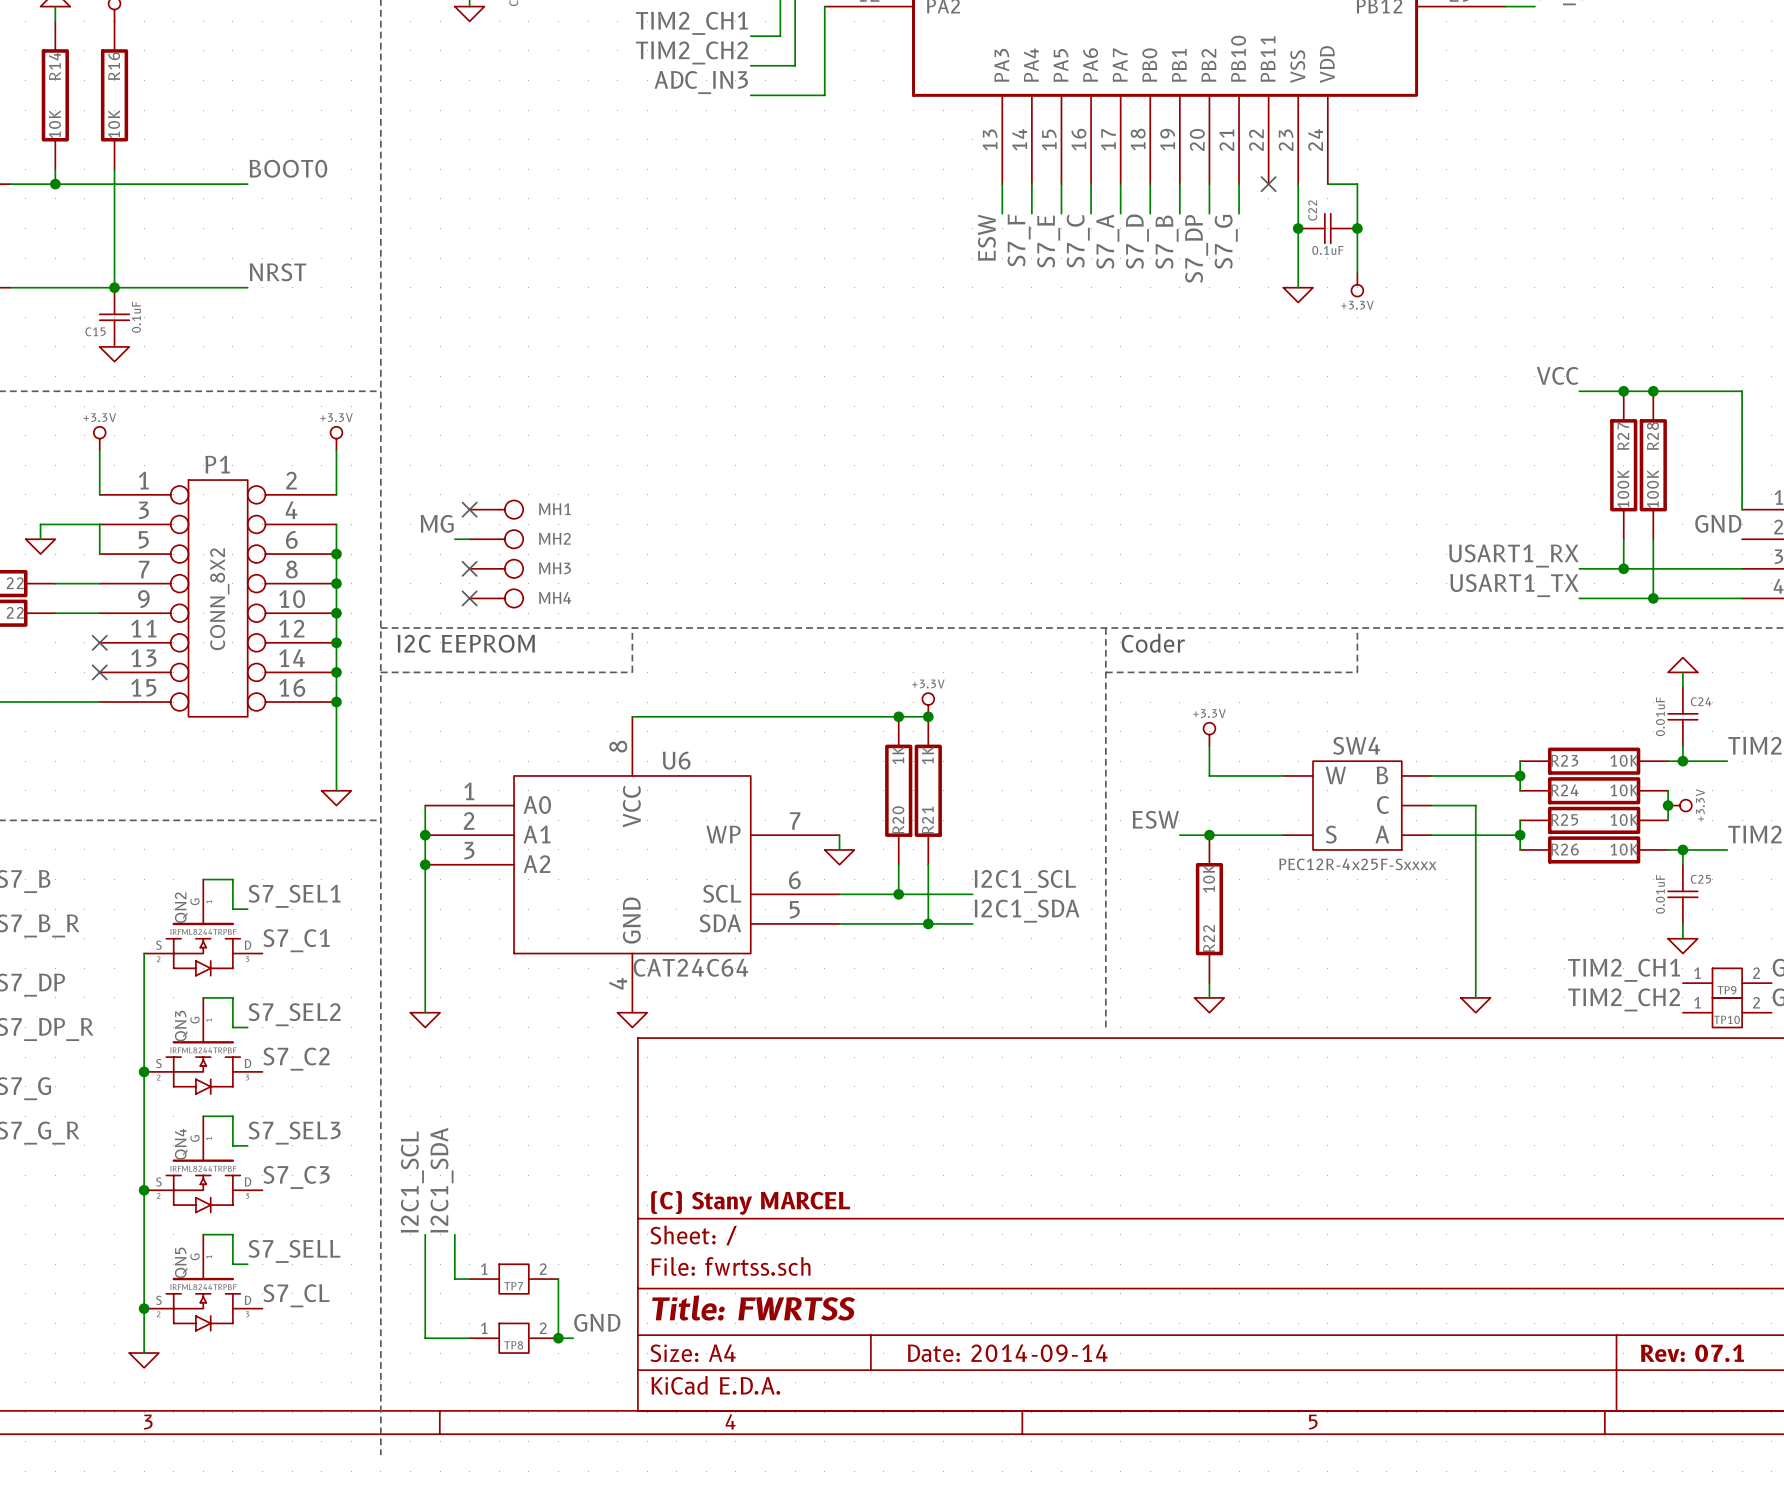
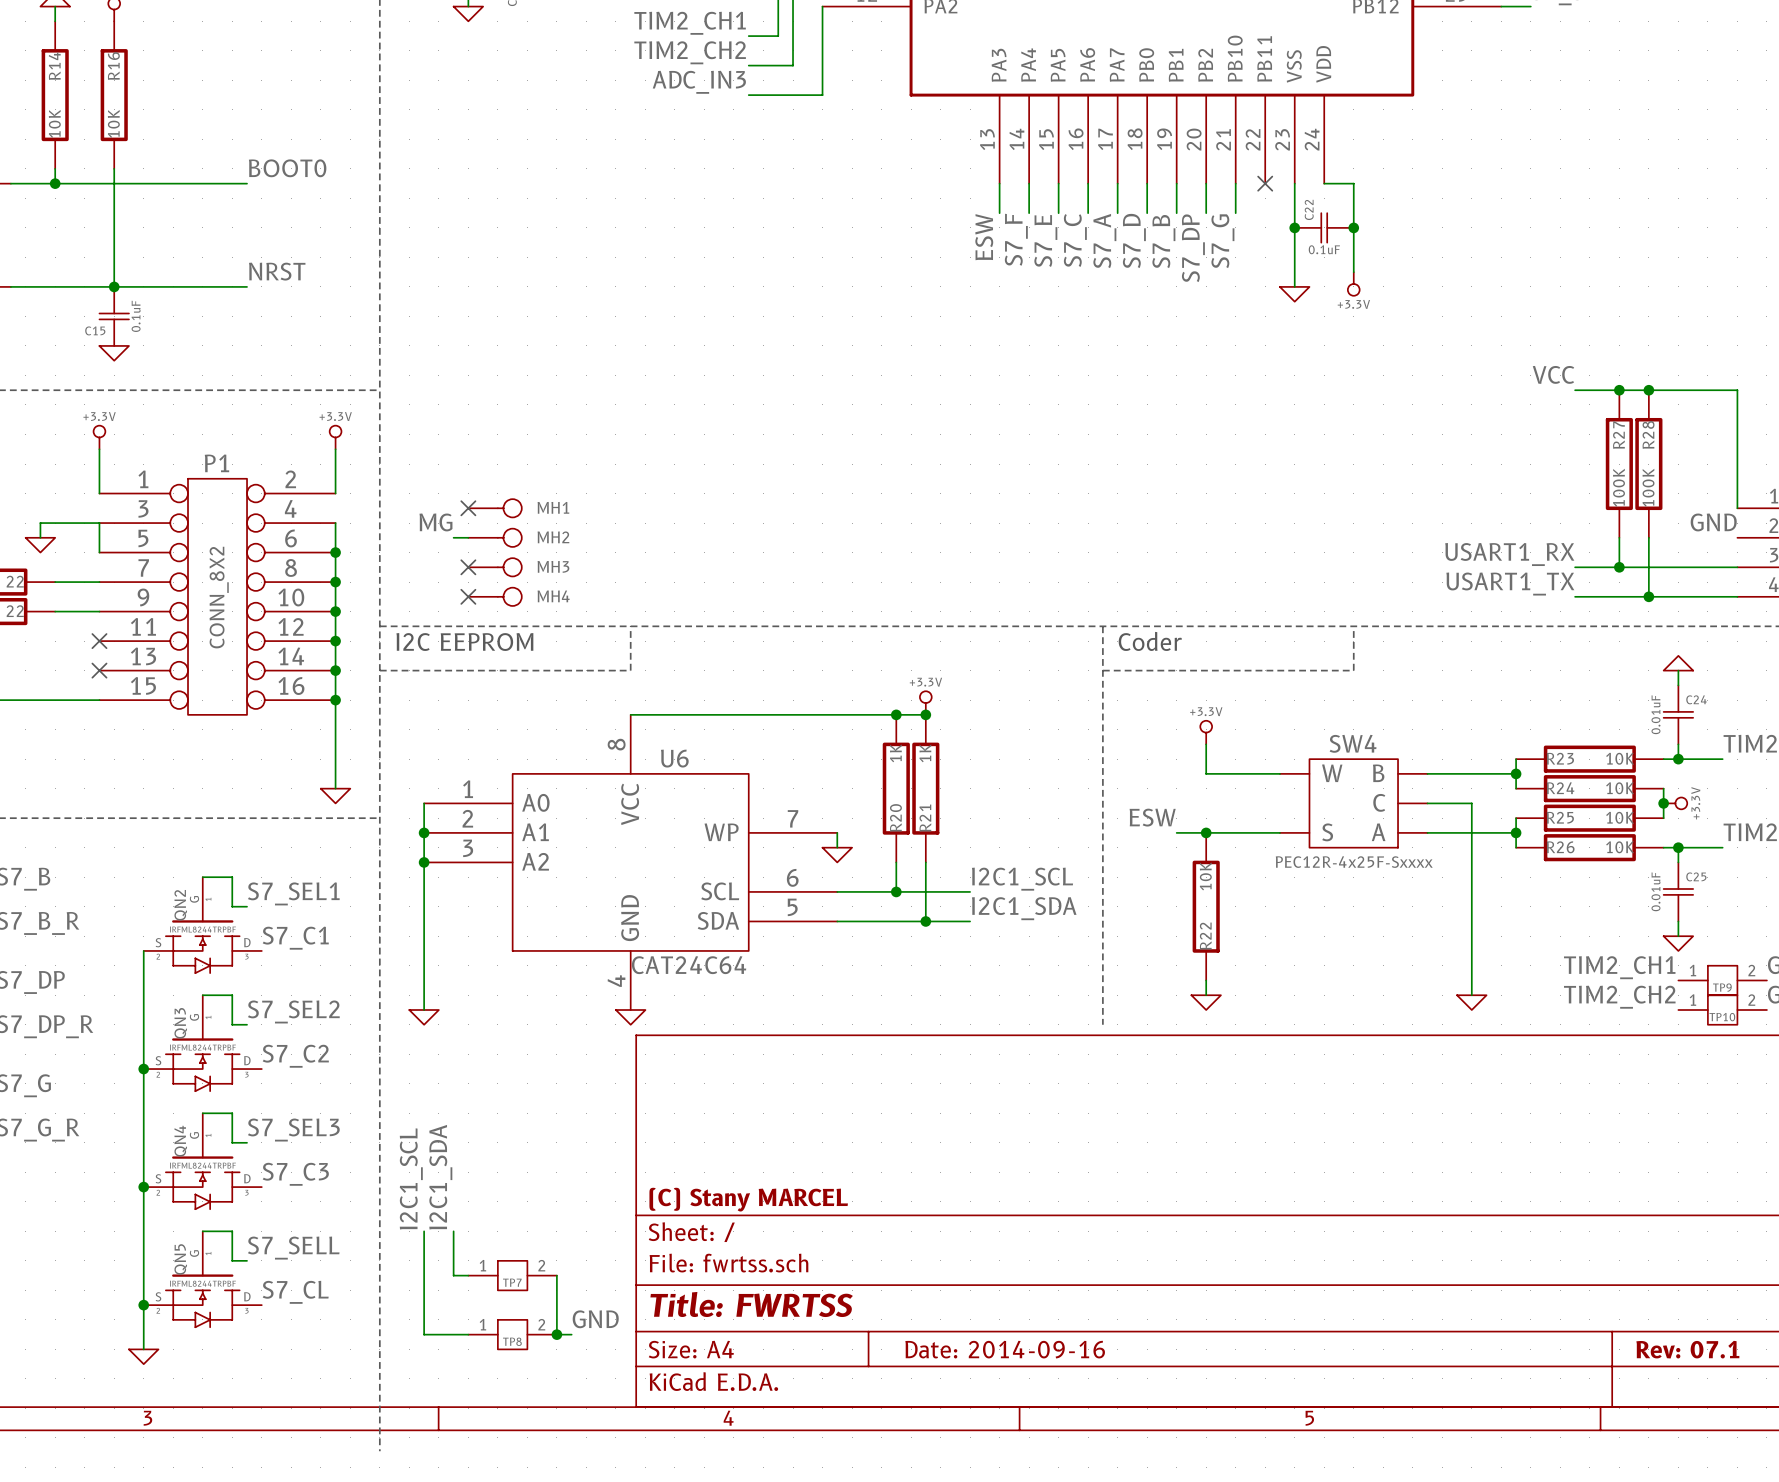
title block: Date: 2014-09-14 (1007, 1353) -> Date: 2014-09-16 (1005, 1349)

